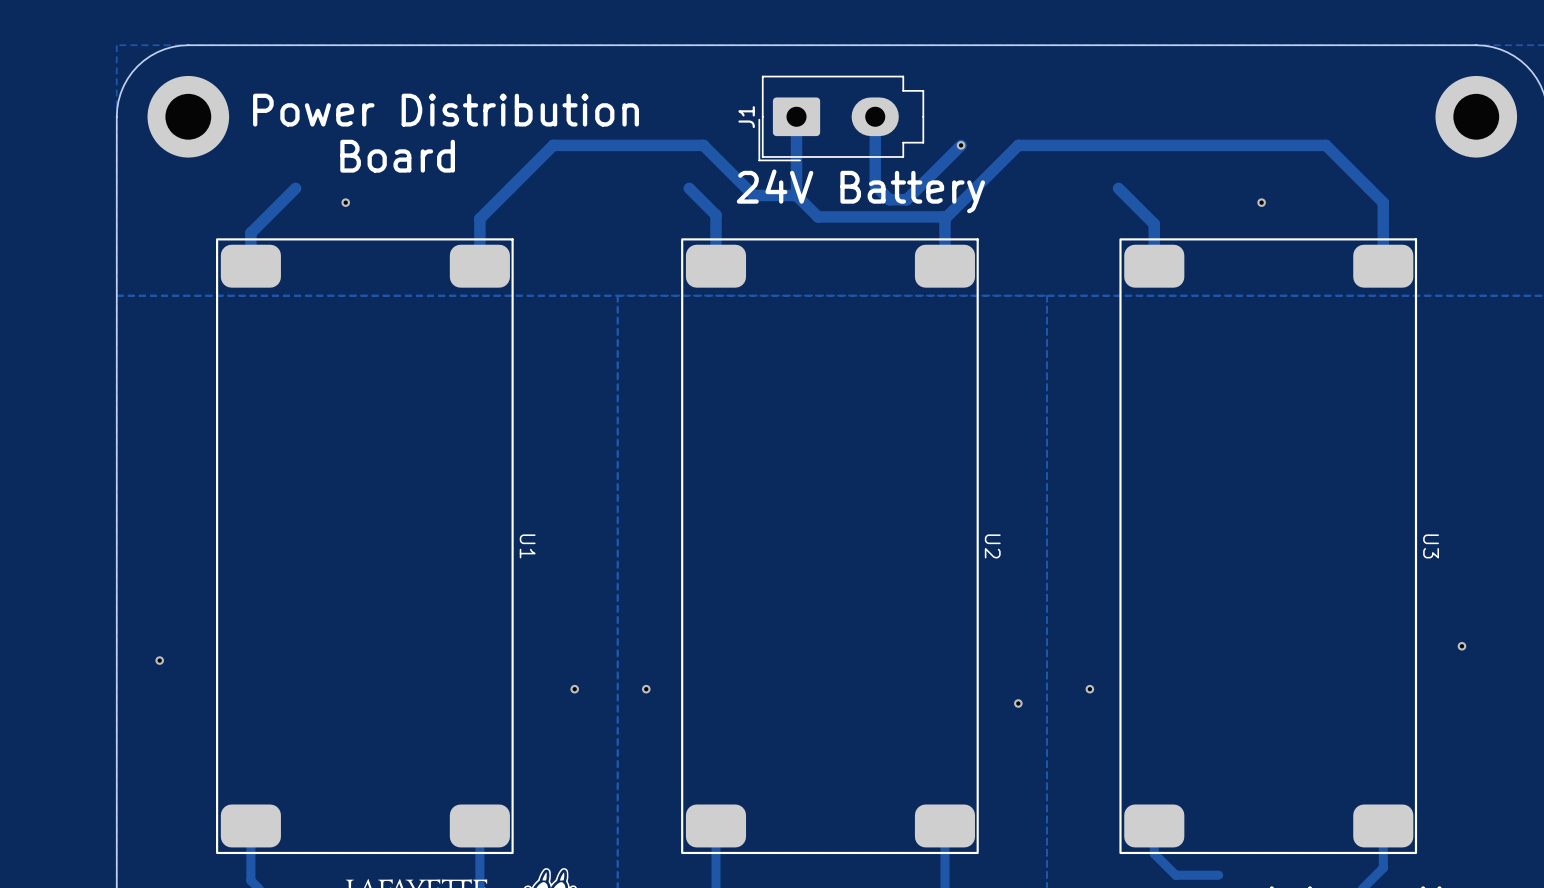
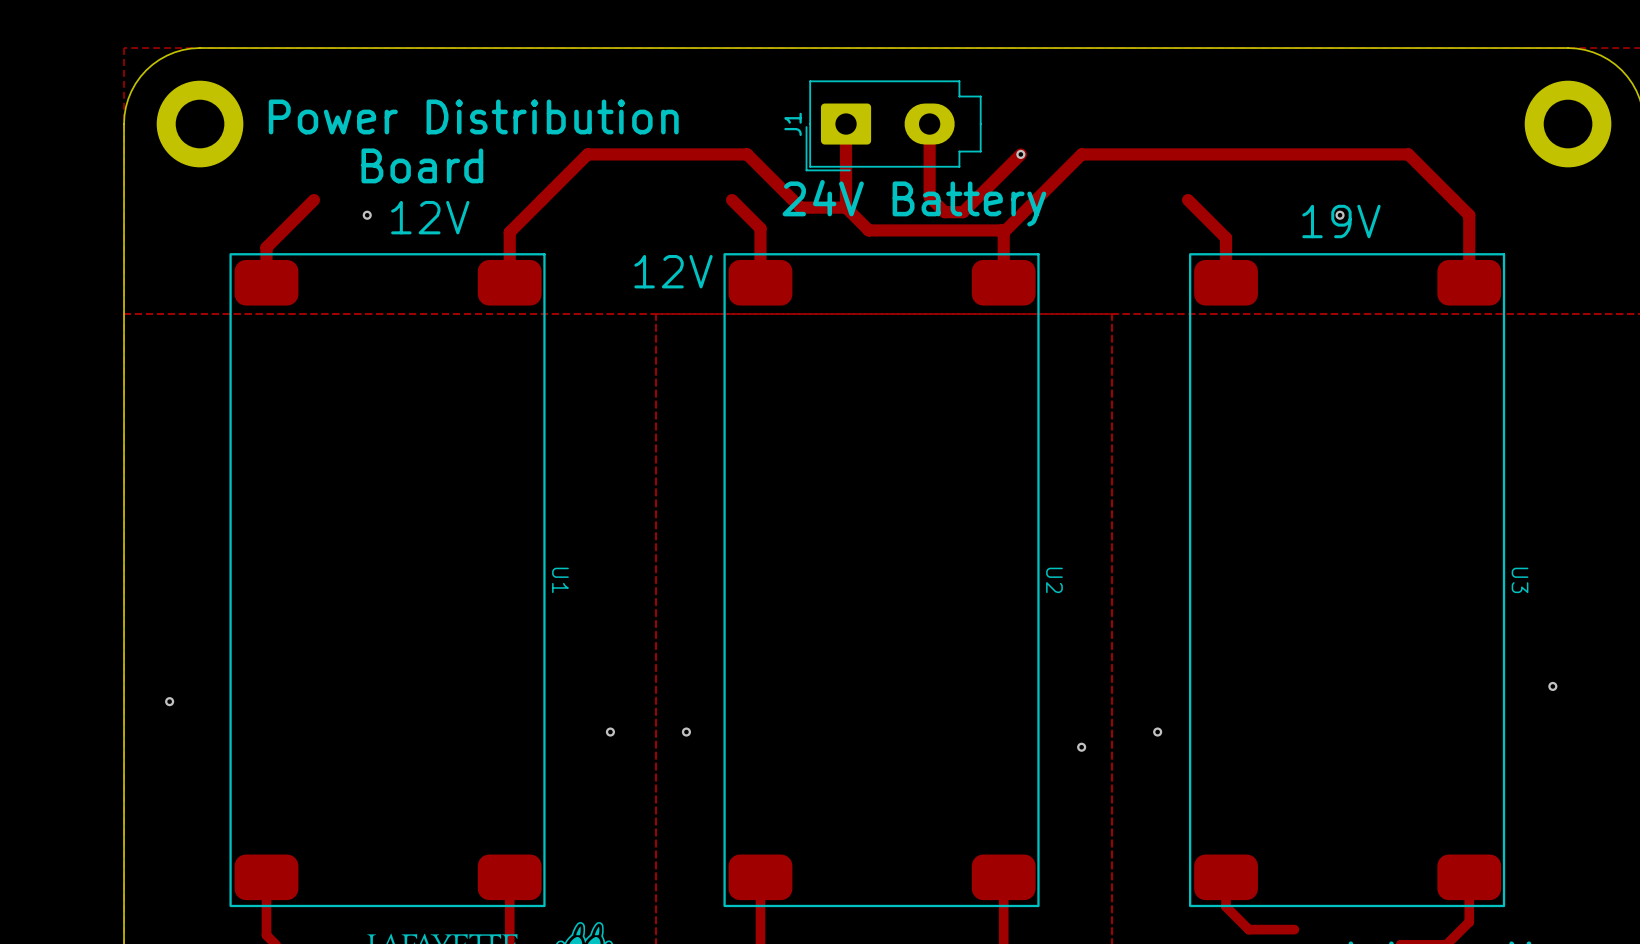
text: none -> 12V (430, 217)
text: none -> 19V (1341, 221)
text: none -> 12V (673, 271)

